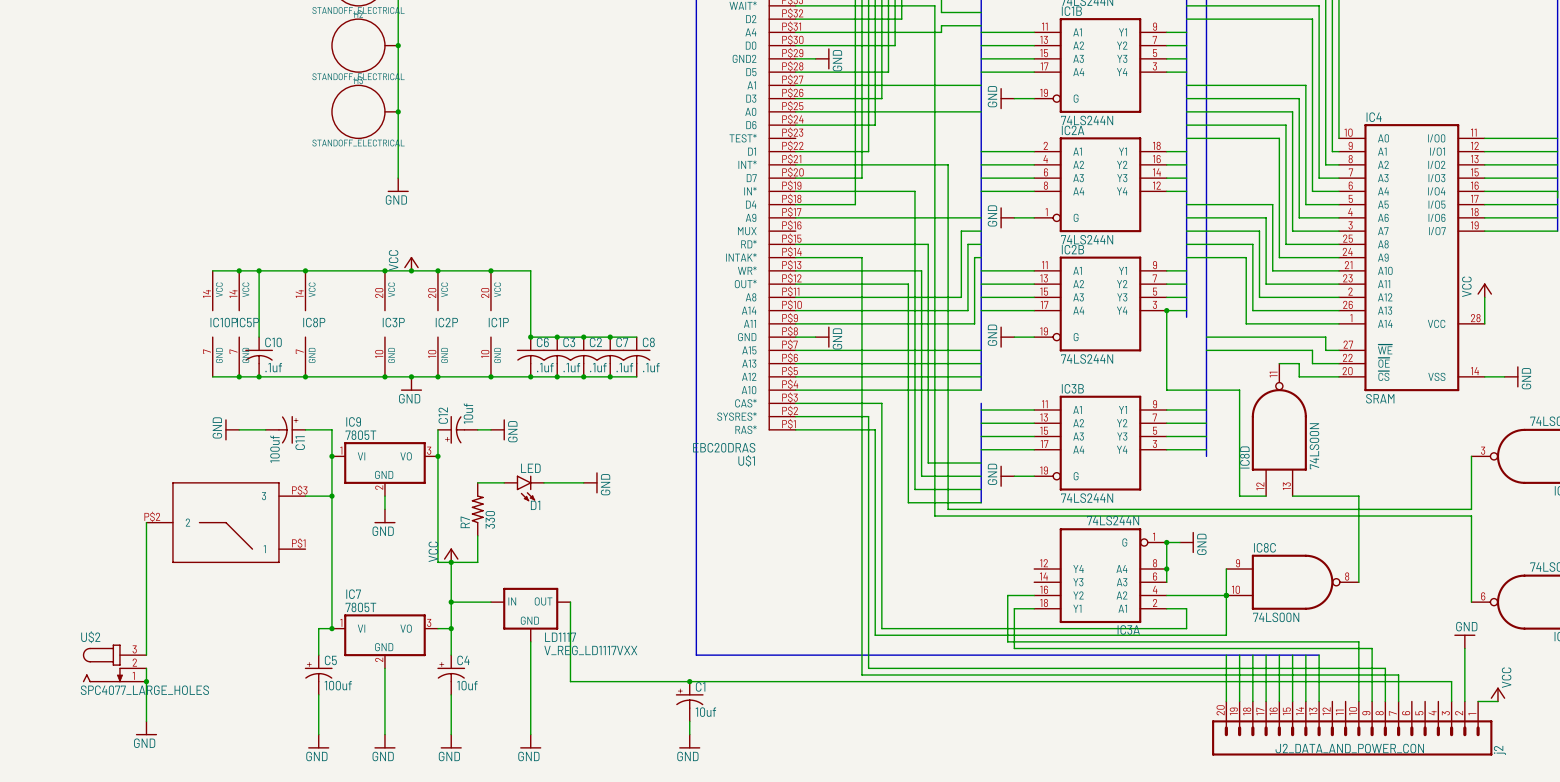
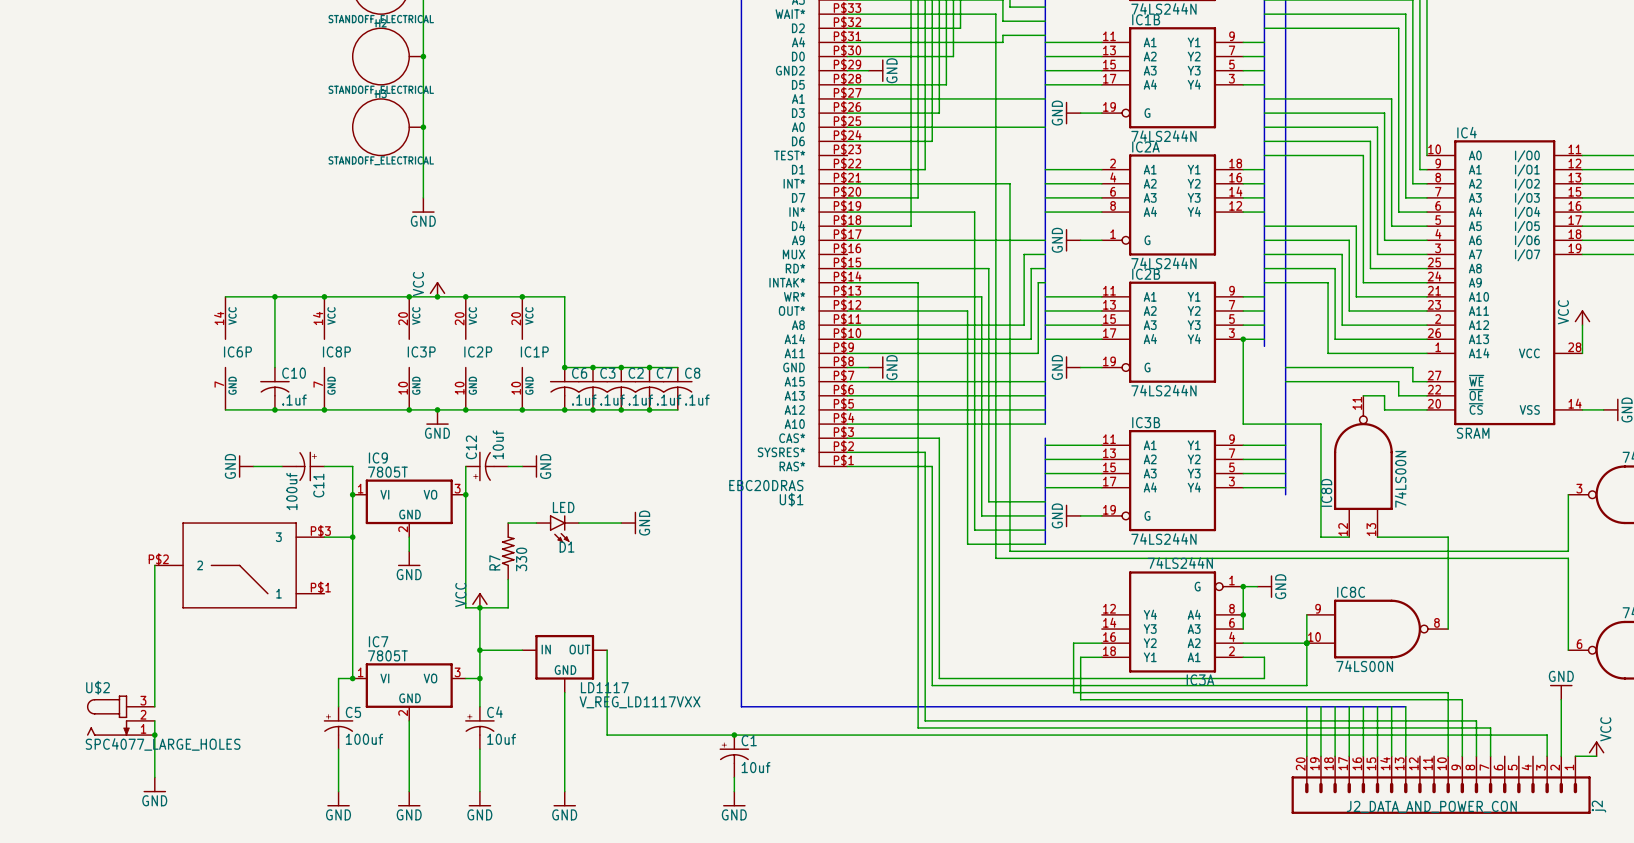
junction: (239, 270) -> none
IC10P name: IC10P (223, 322) -> IC6P (237, 351)
IC5P: (239, 323) -> none
junction: (239, 376) -> none

